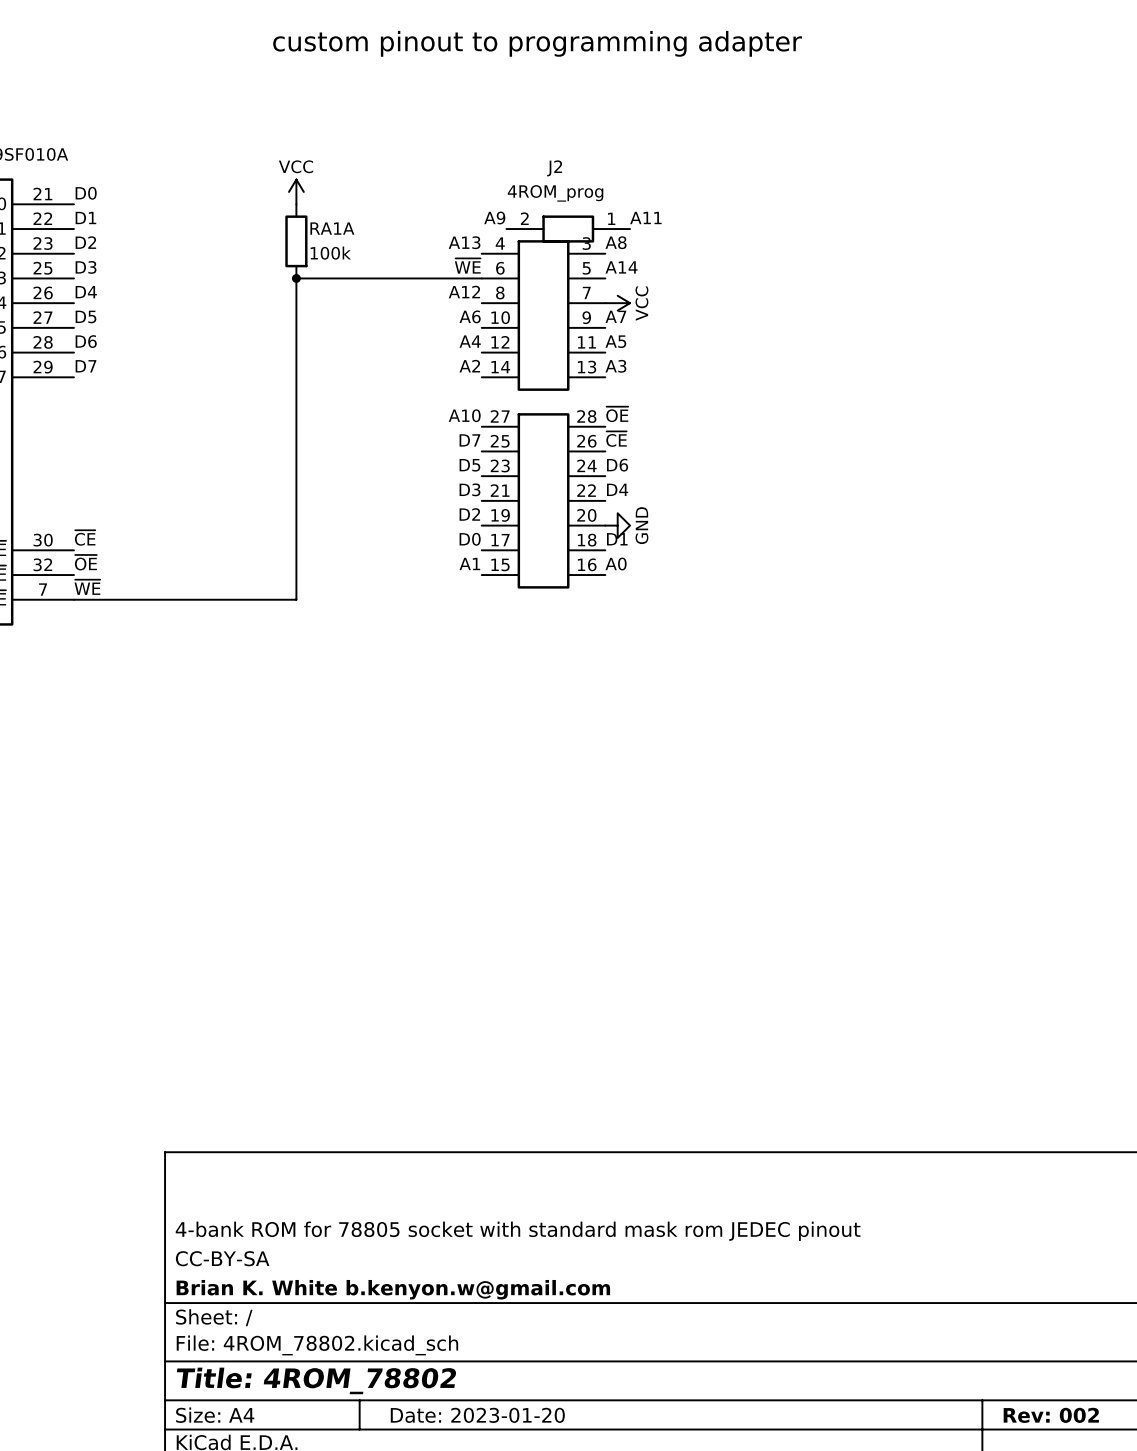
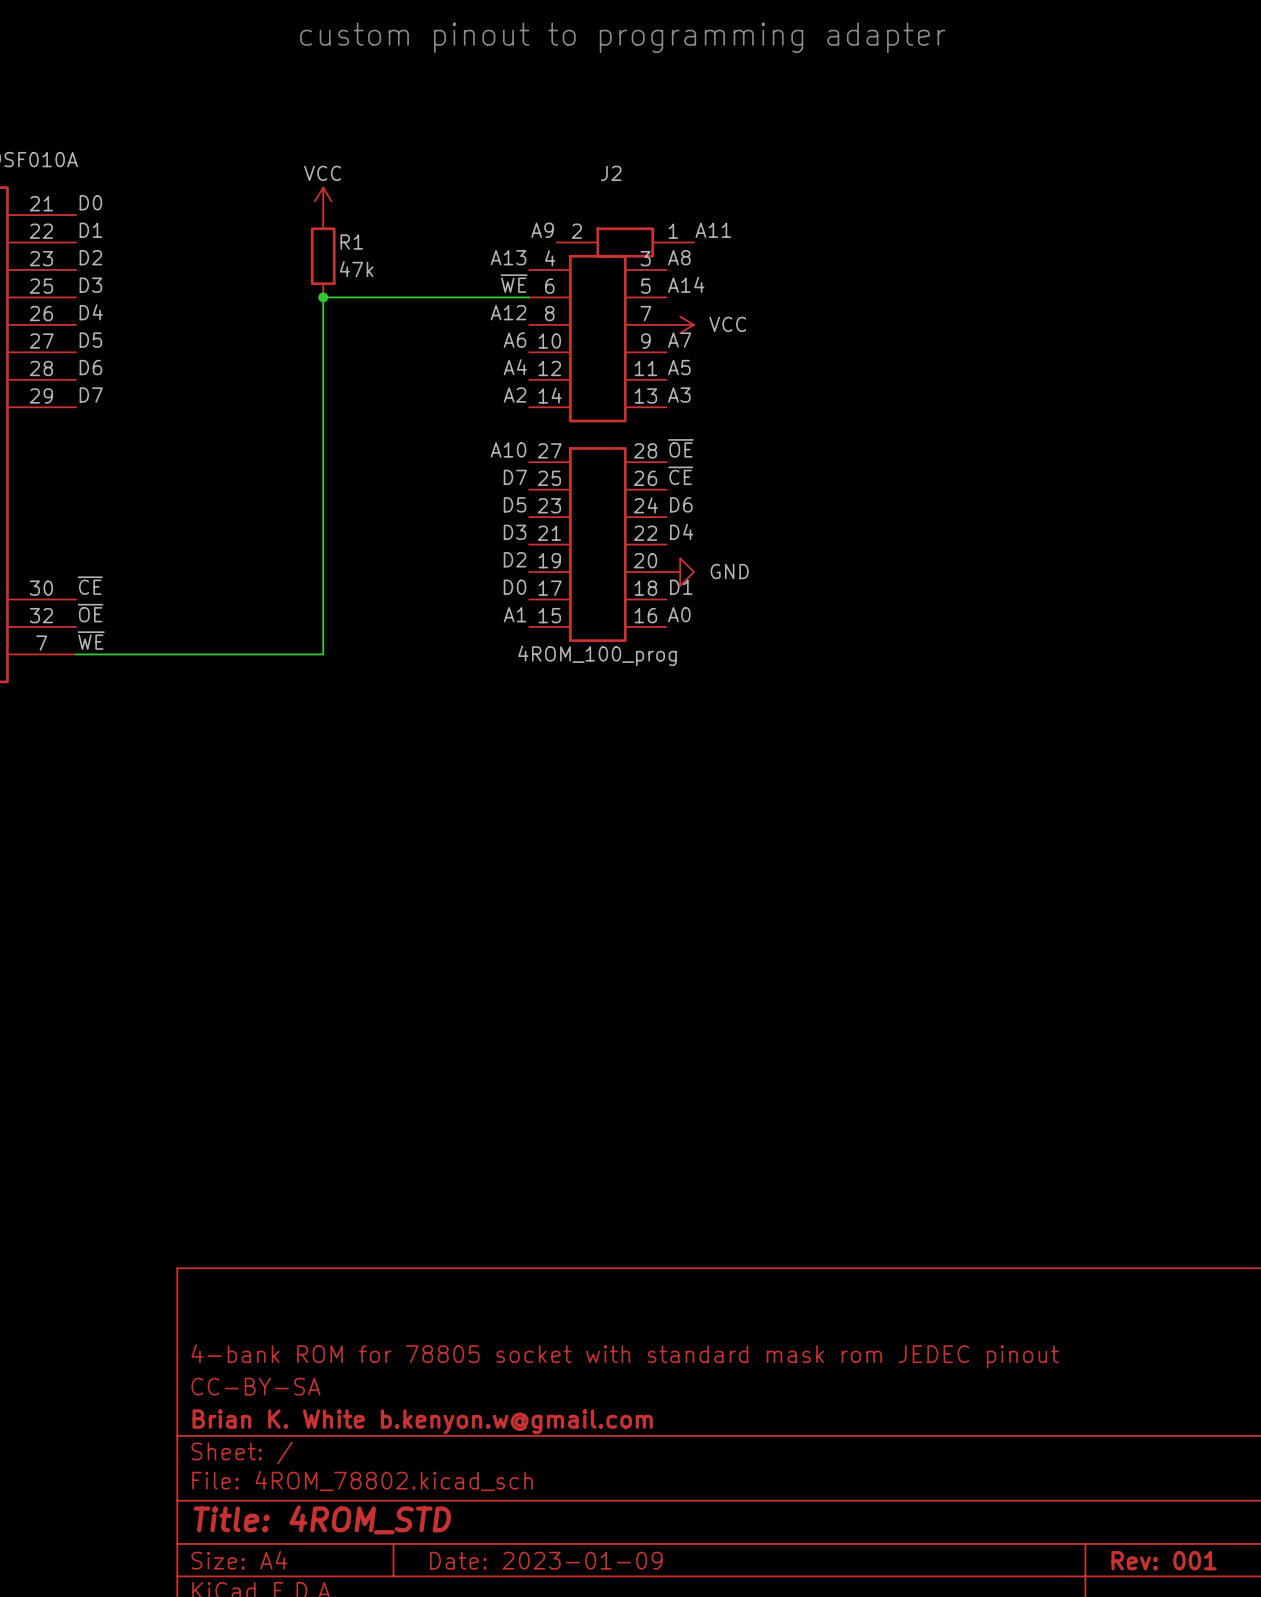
J2 value: 4ROM_prog (555, 193) -> 4ROM_100_prog (597, 655)
RA1A name: RA1A (332, 228) -> R1 (351, 241)
RA1A value: 100k (330, 253) -> 47k (356, 269)
power symbol text rotation: 0° (641, 303) -> 90° clockwise (727, 324)
power symbol text rotation: 0° (641, 525) -> 90° clockwise (729, 571)
title block: Title: 4ROM_78802 (316, 1380) -> Title: 4ROM_STD (322, 1519)
title block: Date: 2023-01-20 (477, 1415) -> Date: 2023-01-09 (546, 1560)
title block: Rev: 002 (1051, 1415) -> Rev: 001 (1164, 1560)

